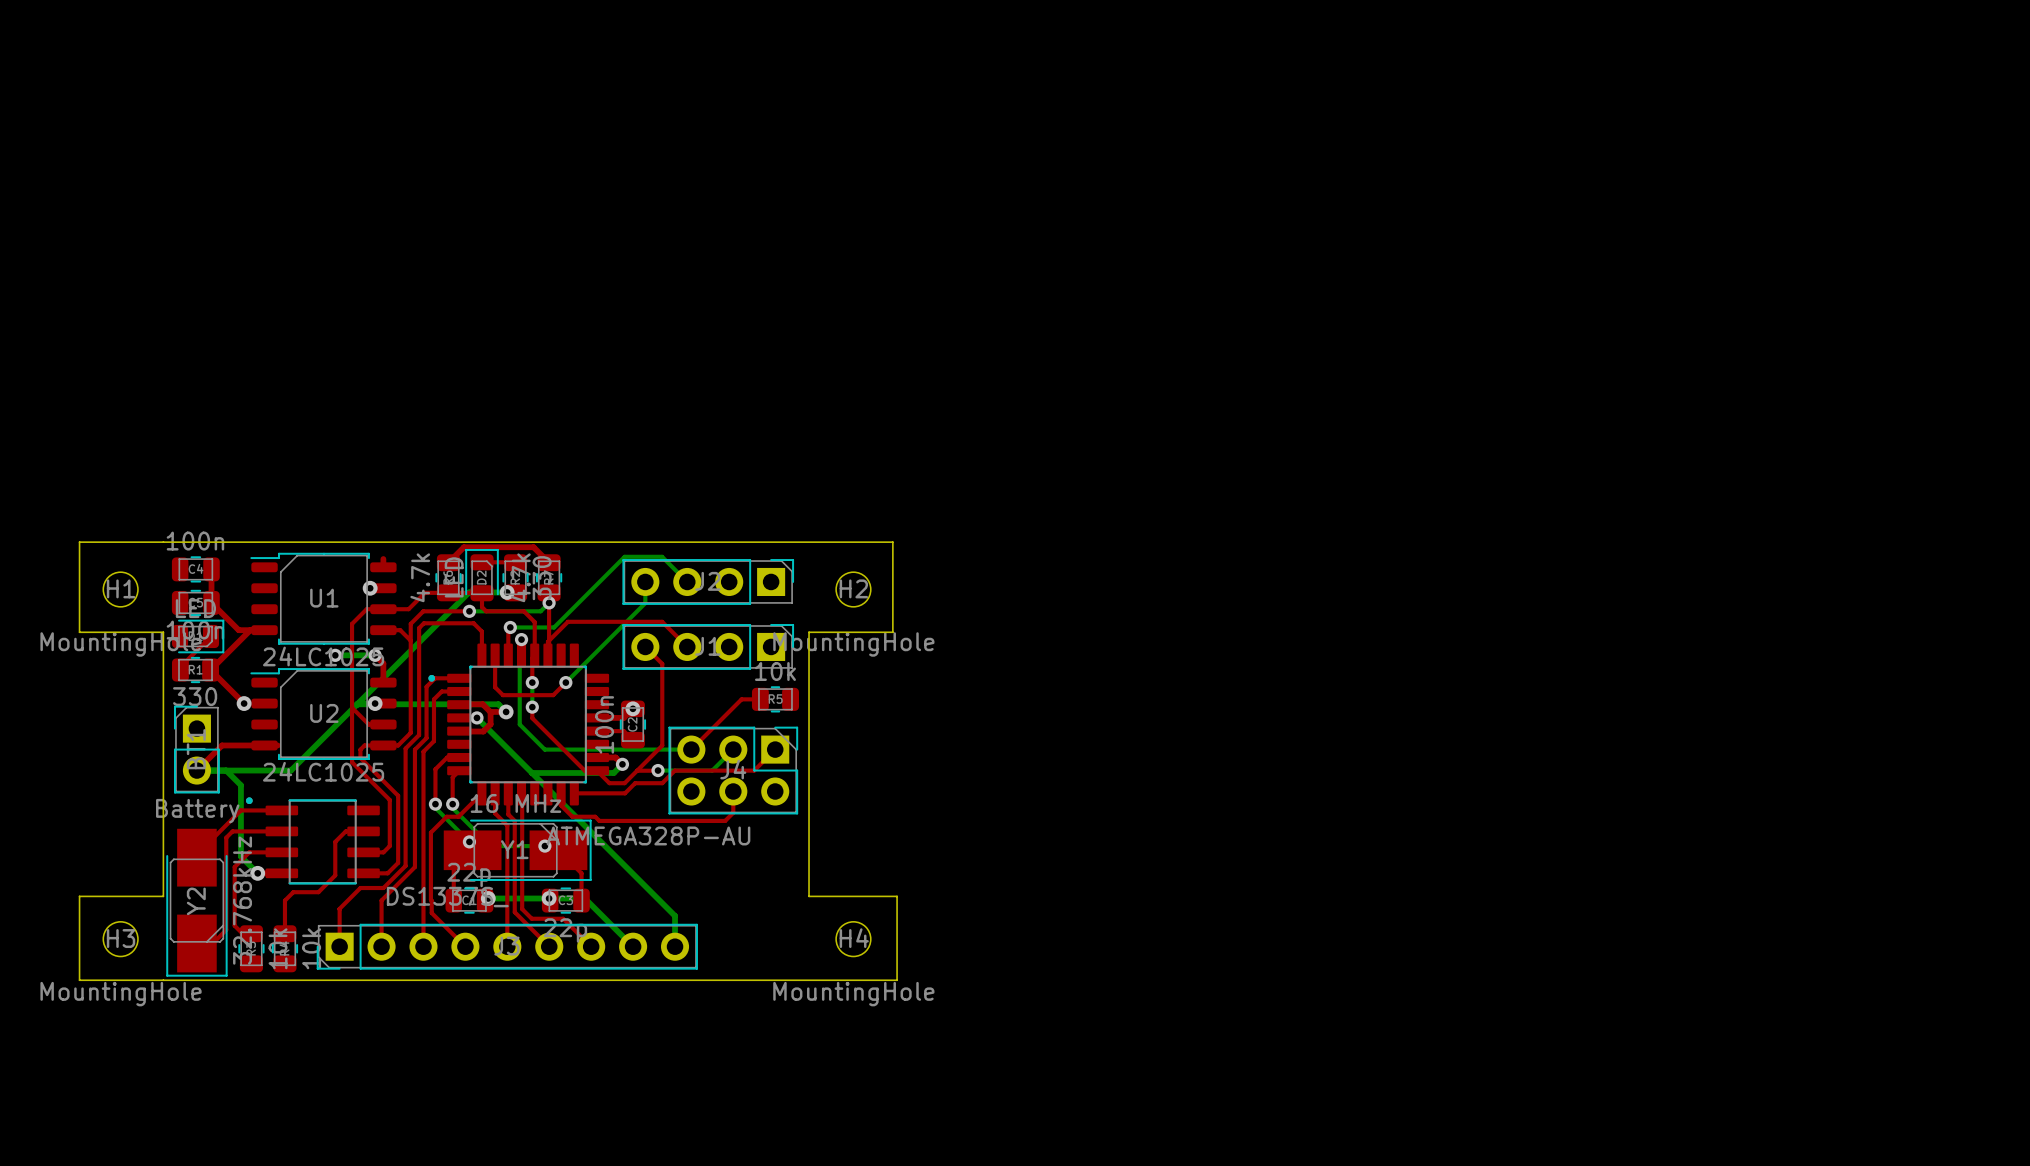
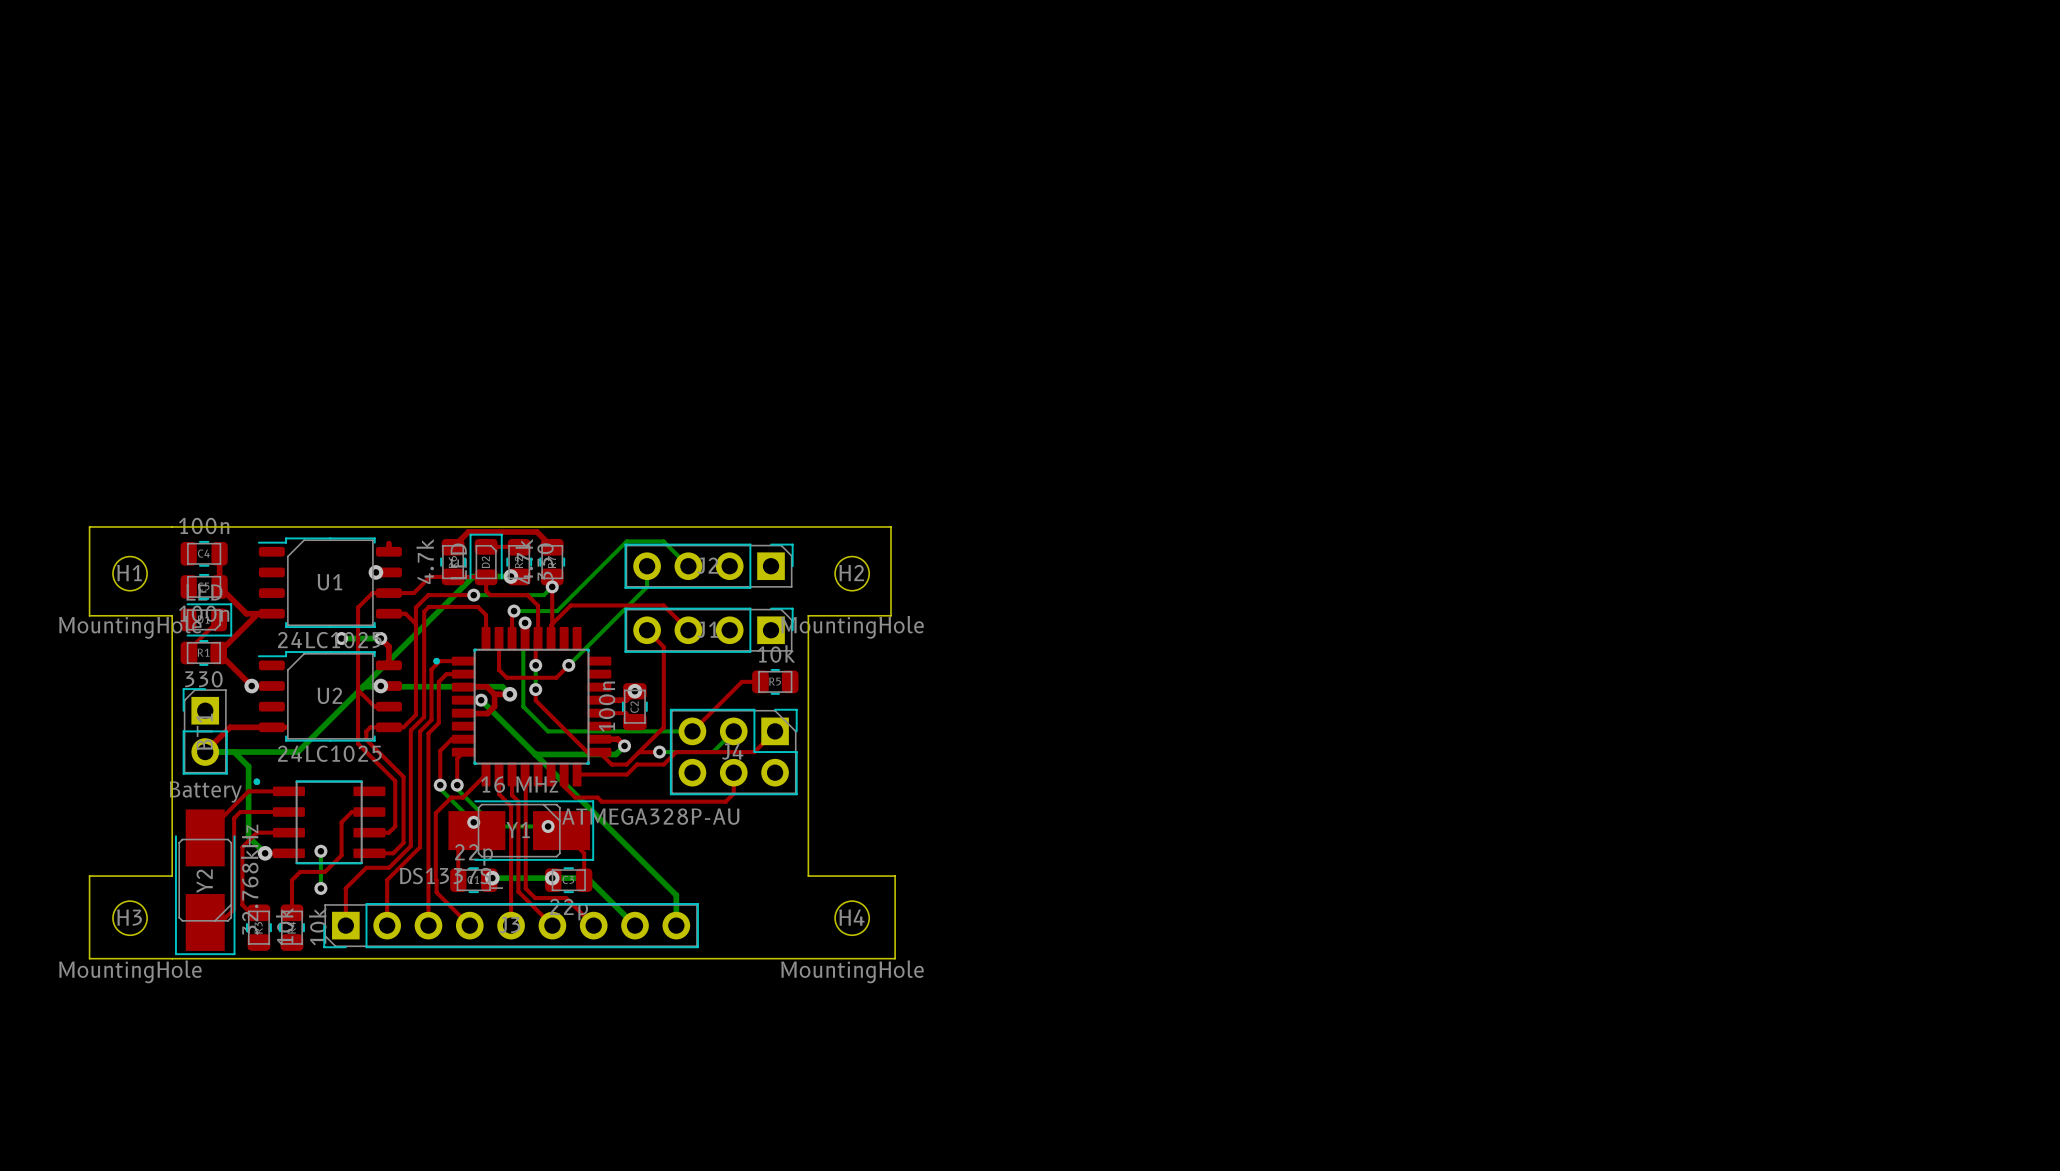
bottom track: none -> (320, 851) (320, 888)
via: none -> (320, 851)
via: none -> (320, 888)

